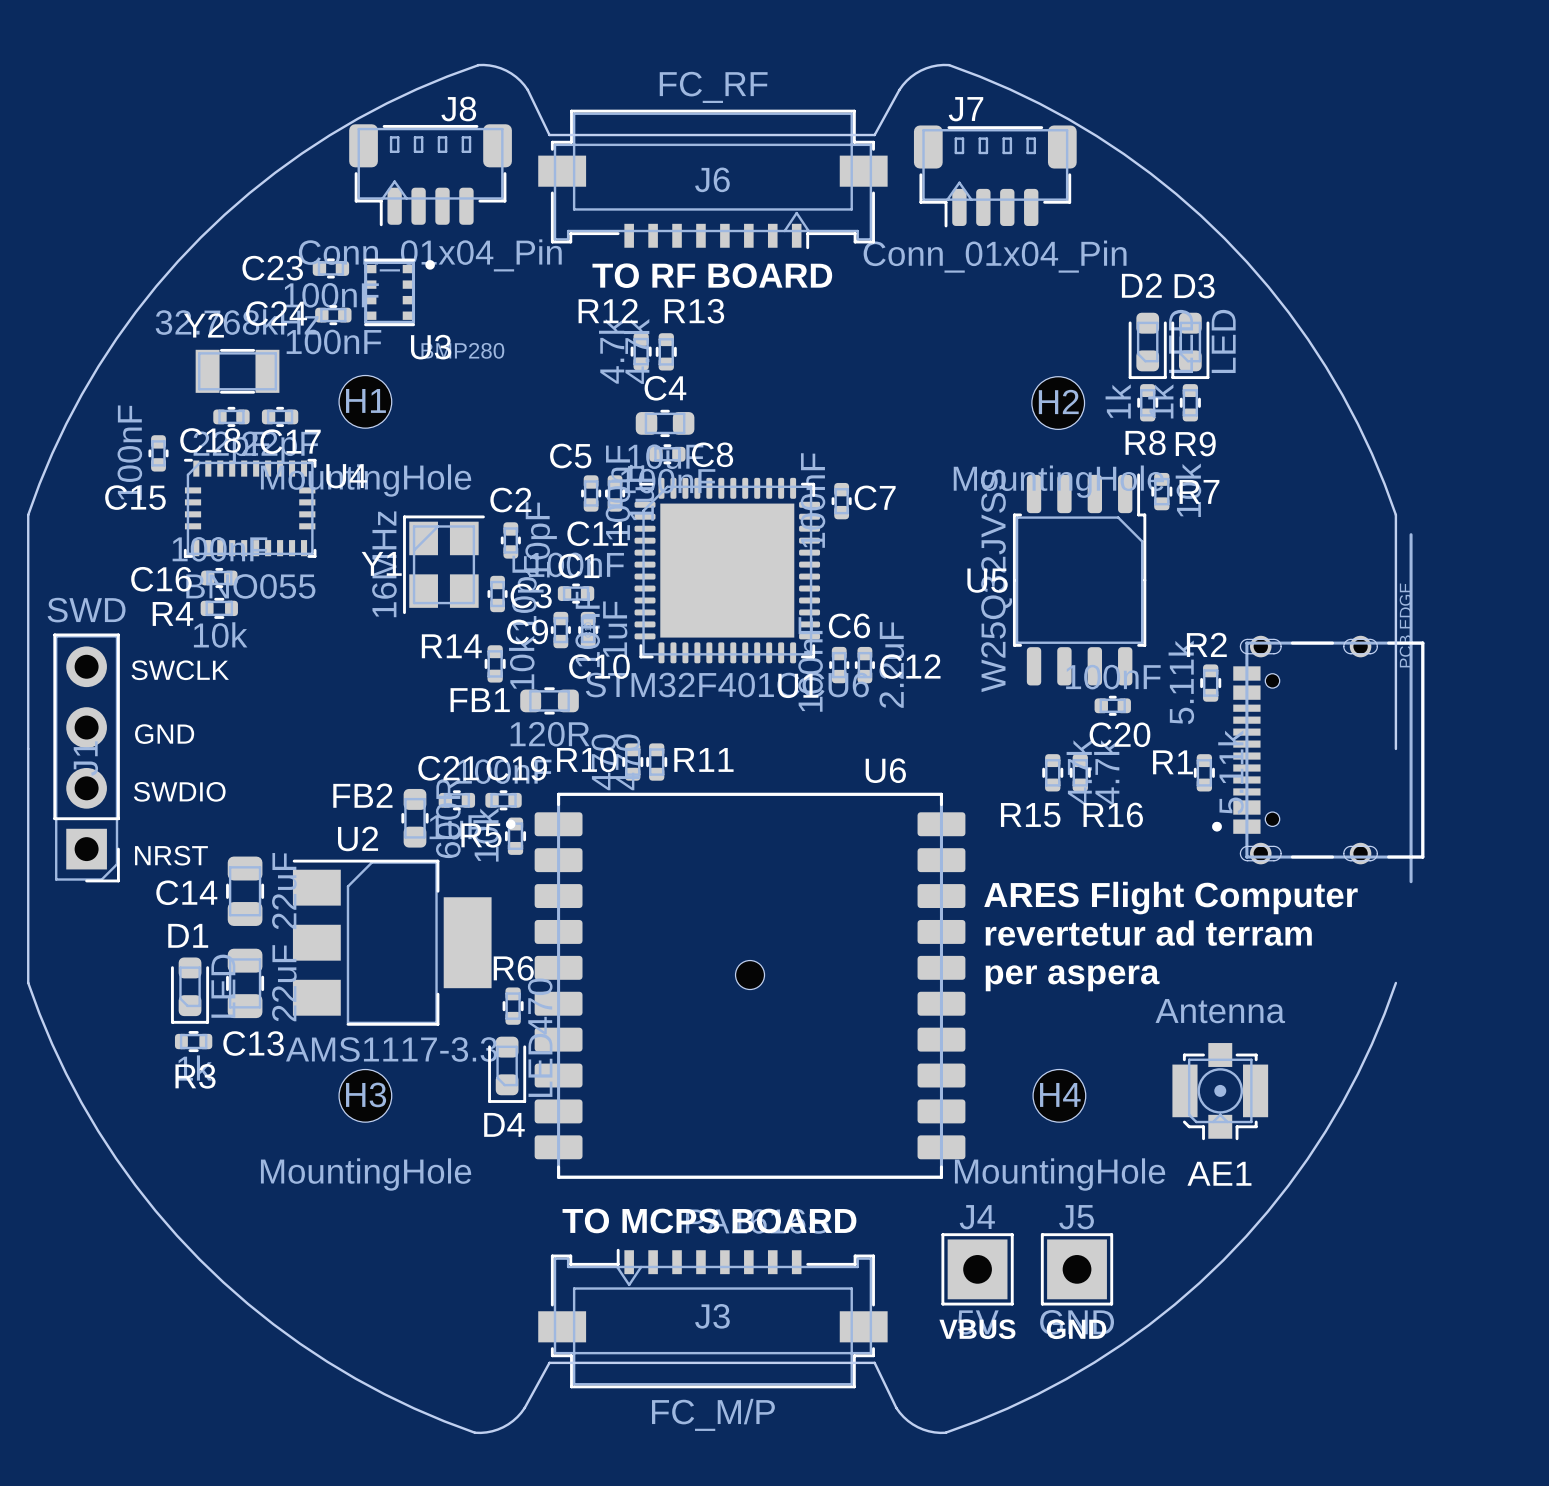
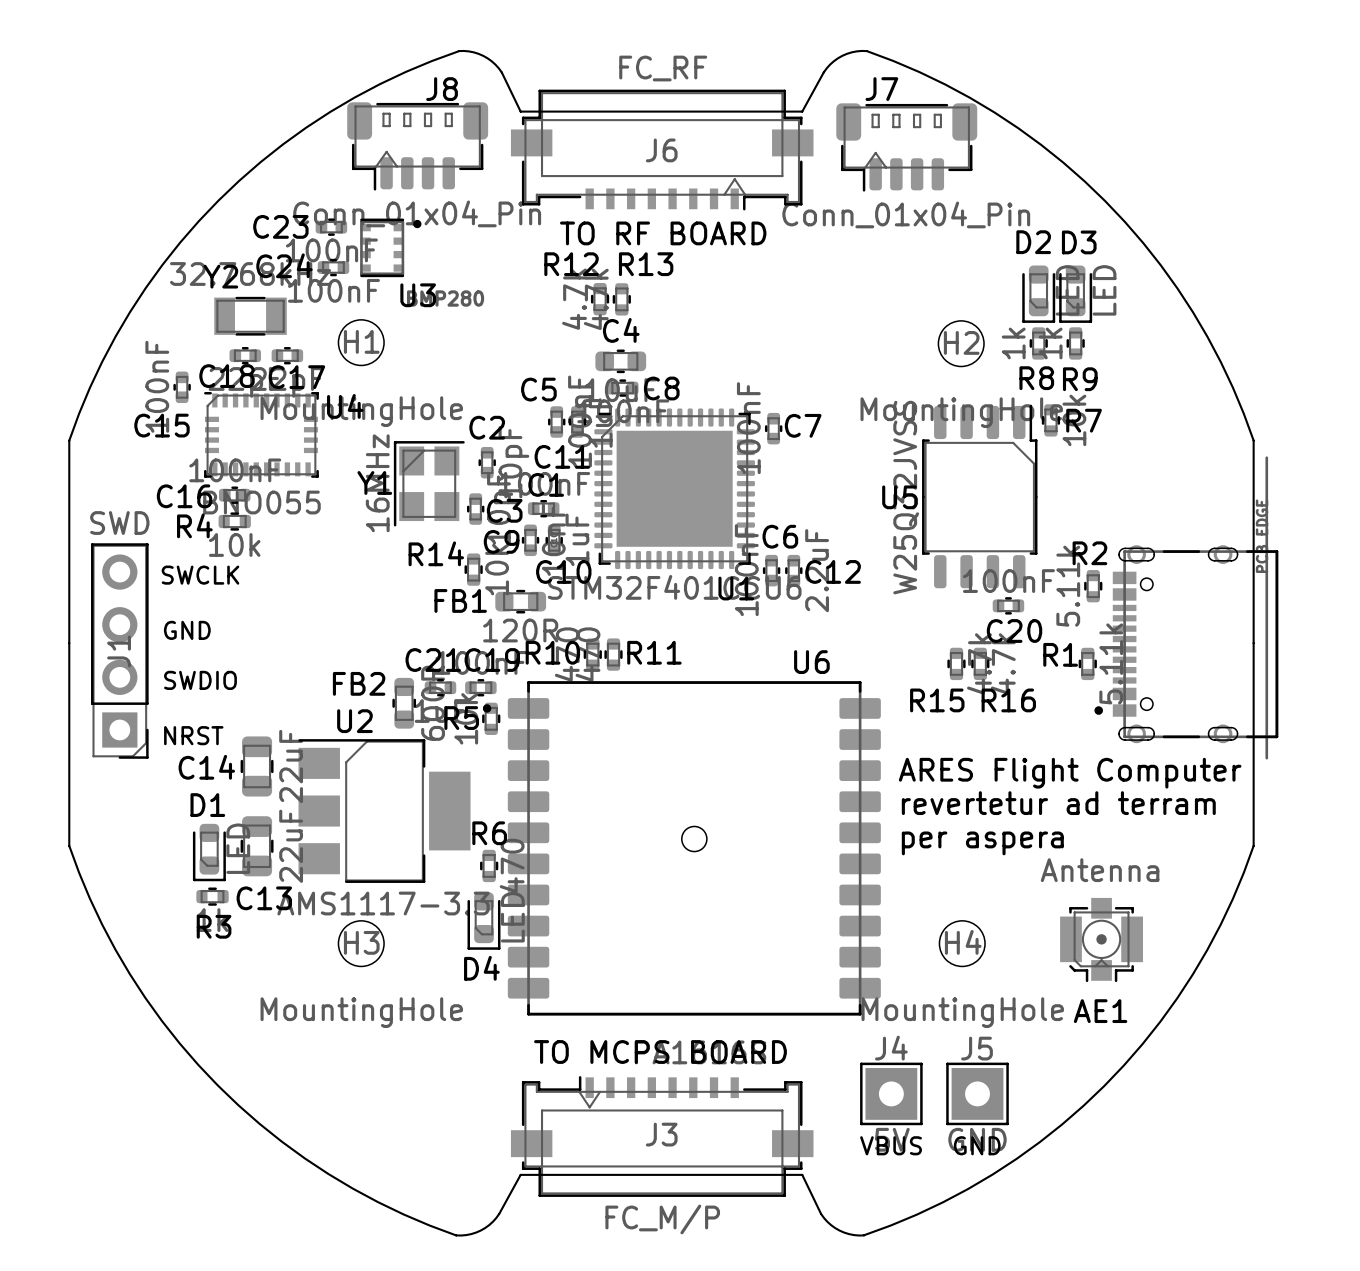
board edge: none -> (1253, 643) (1253, 845)

